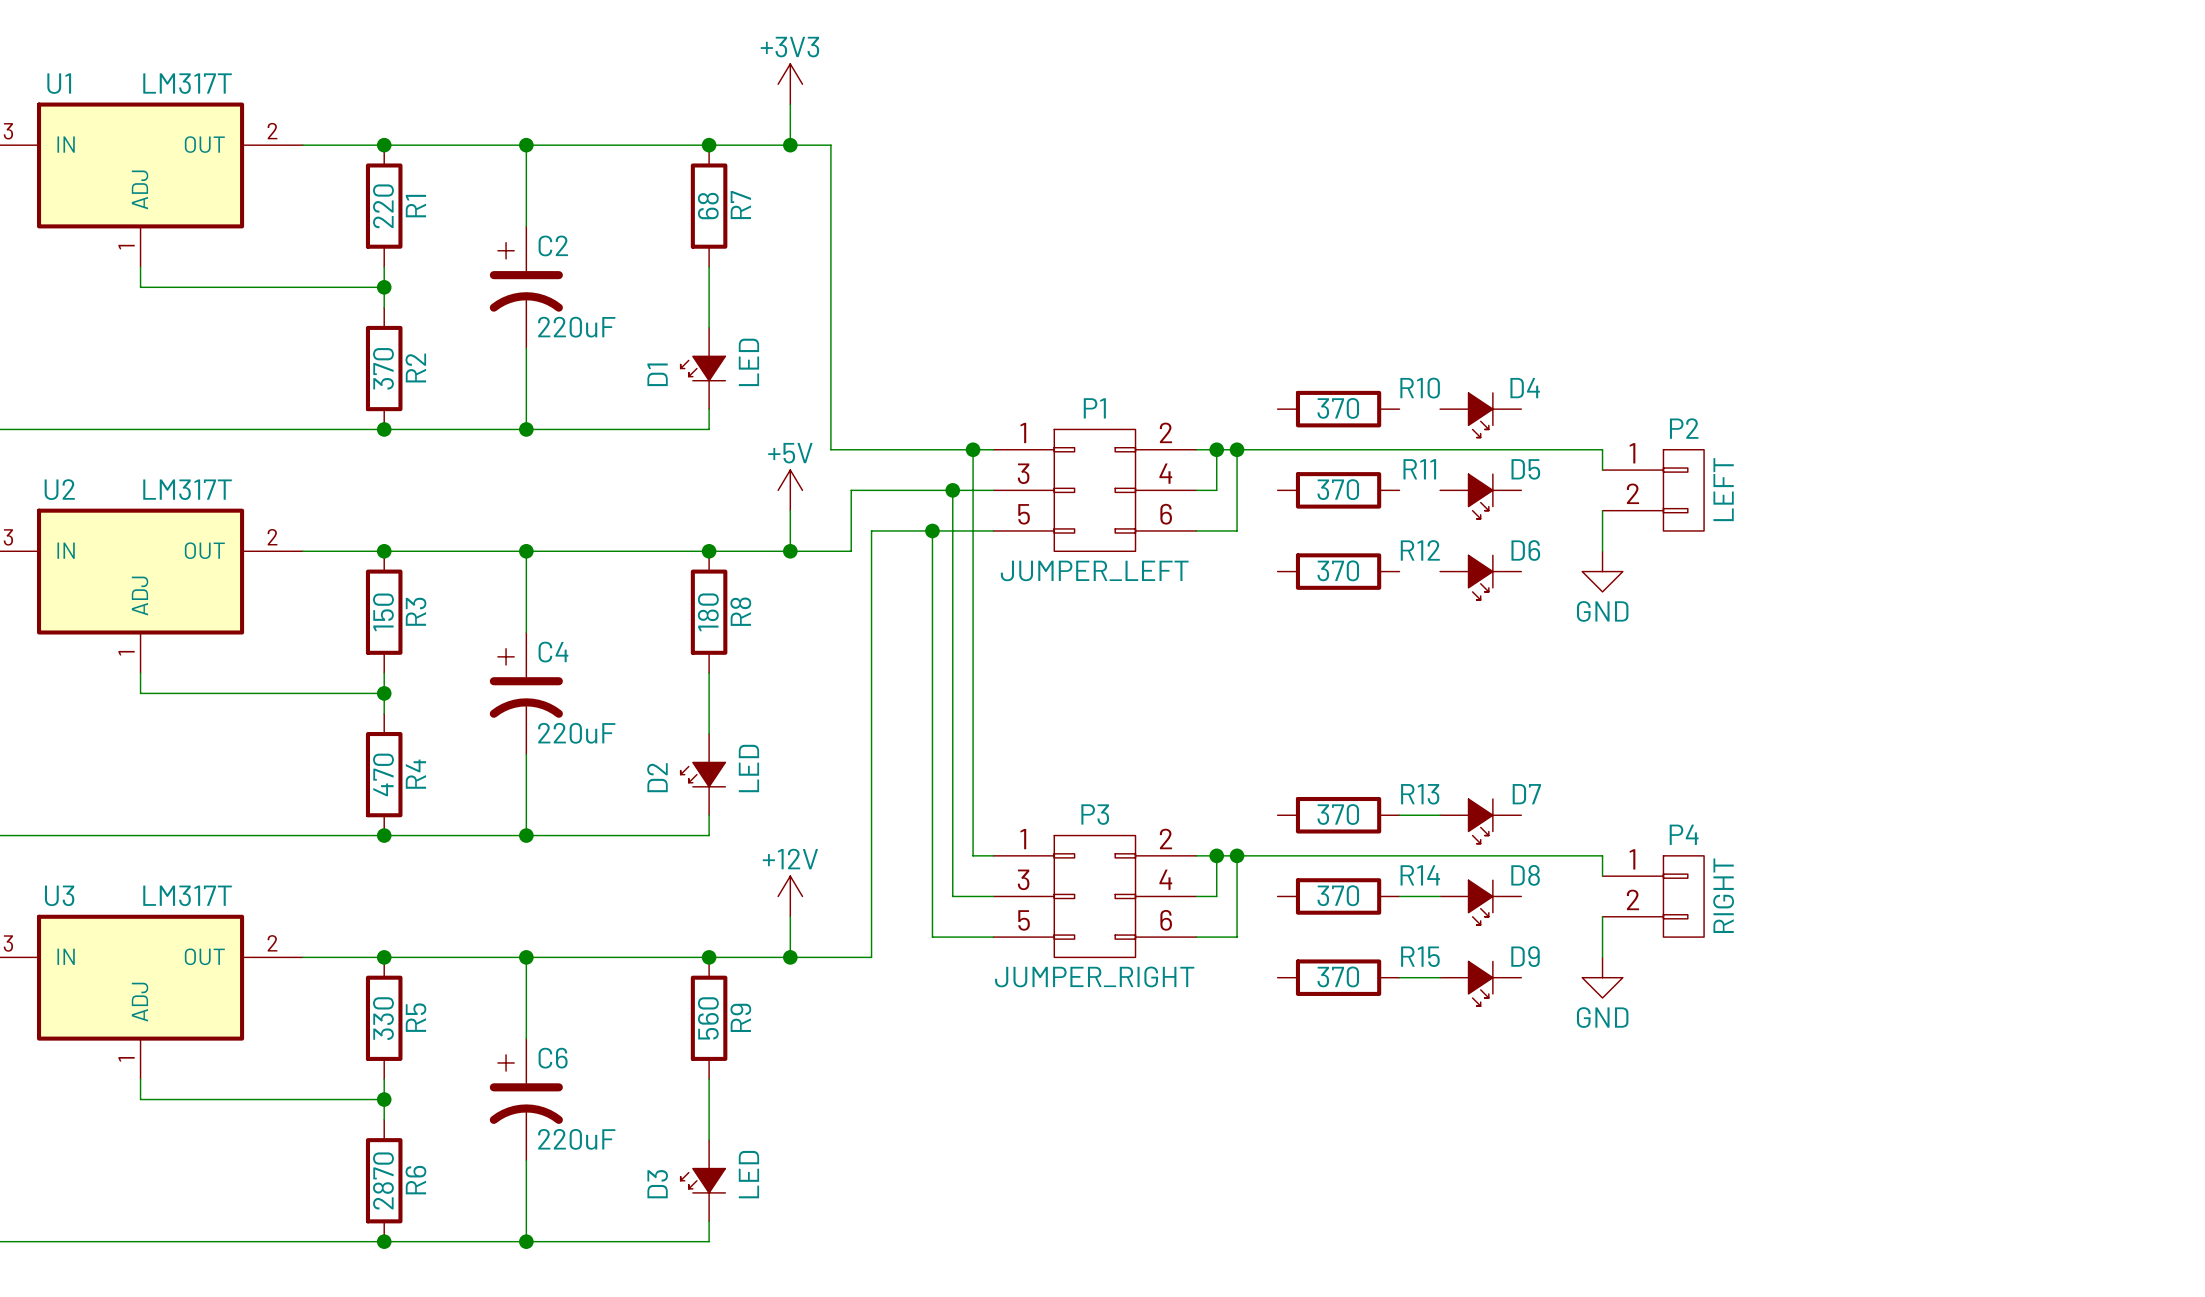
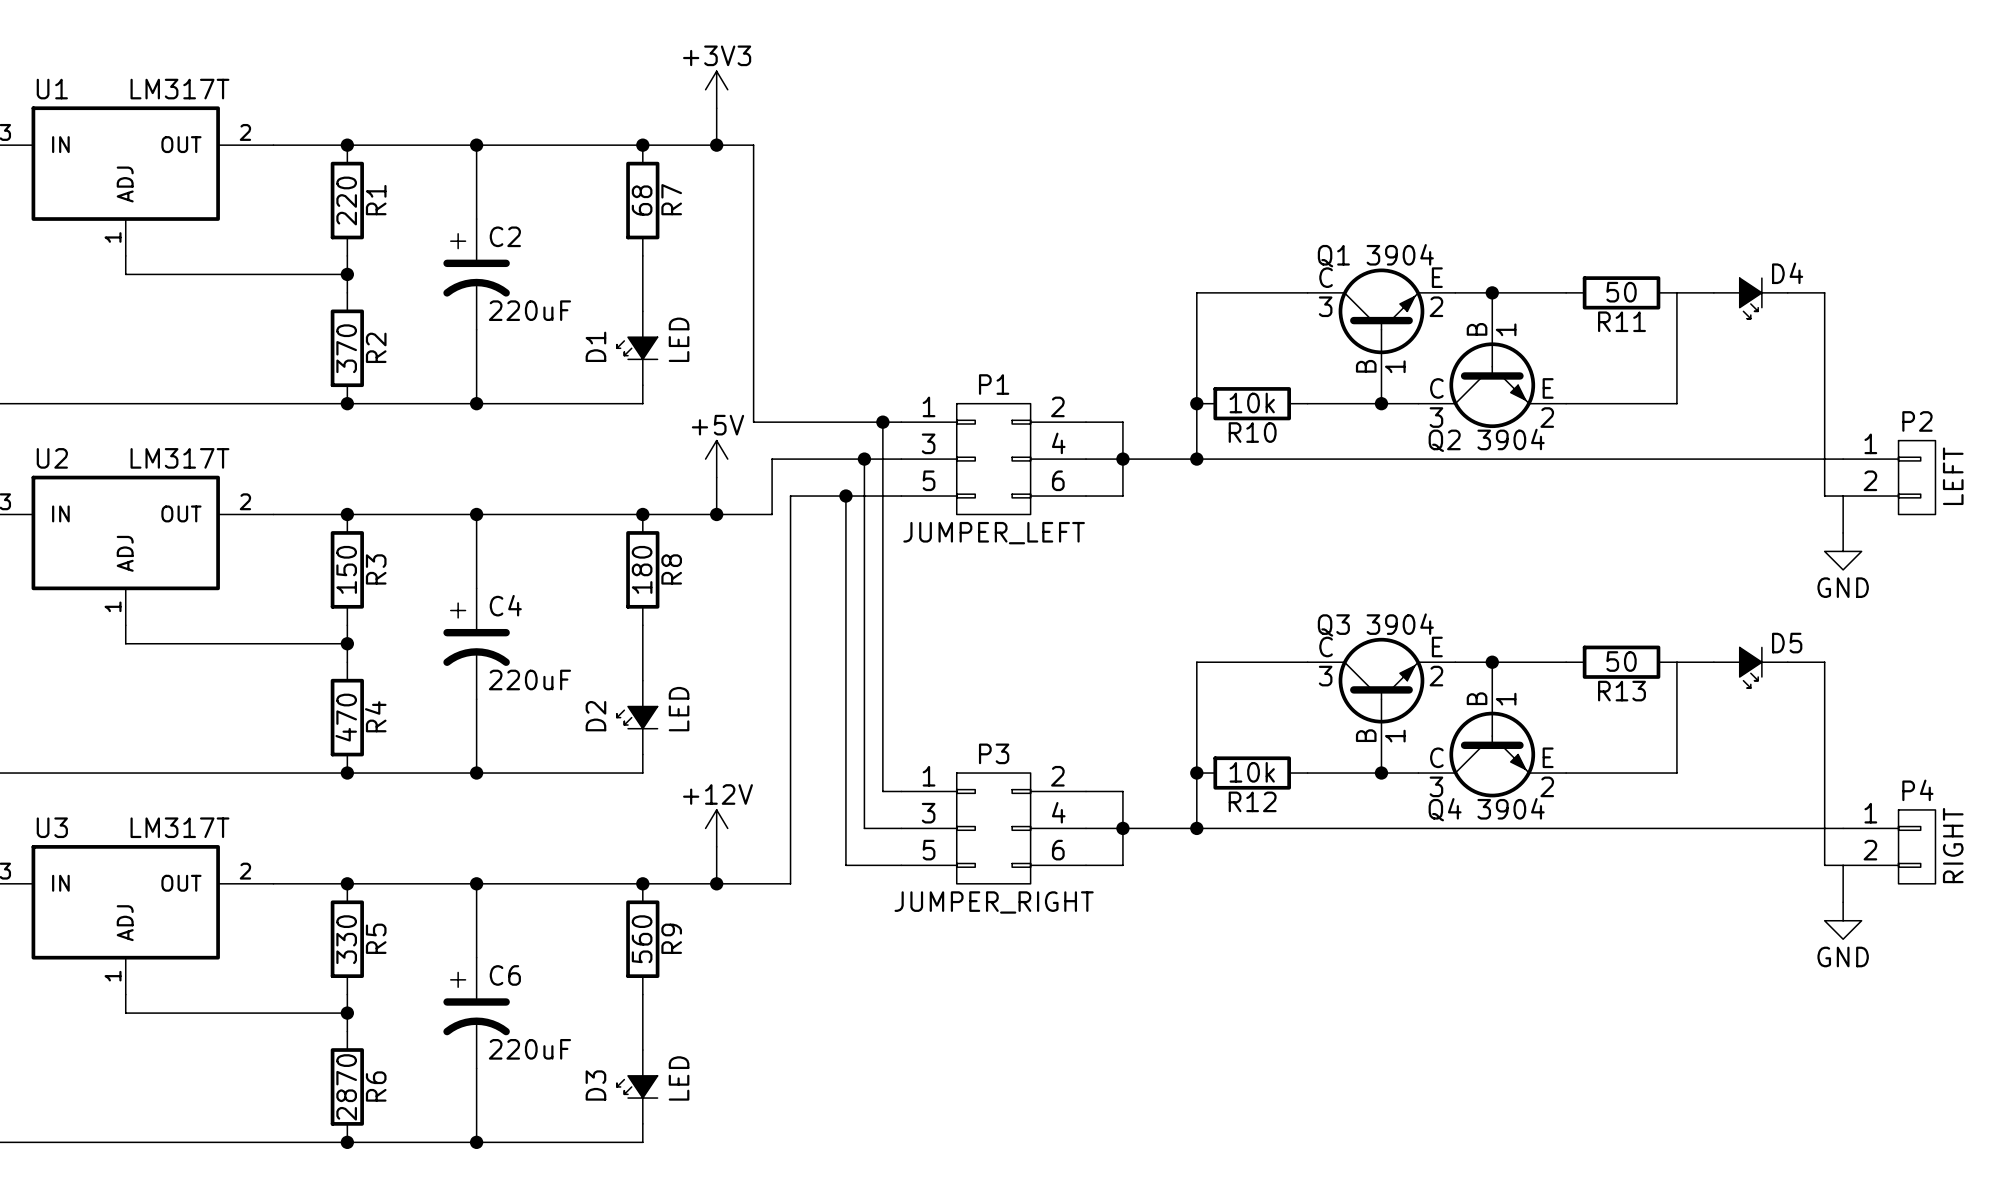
wire: none -> (1307, 292) (1196, 292) (1196, 459)
wire: none -> (1455, 292) (1566, 292)
junction: none -> (1492, 292)
wire: none -> (1713, 292) (1676, 292) (1676, 403) (1566, 403)
wire: none -> (1787, 292) (1824, 292) (1824, 496) (1843, 496) (1843, 532)
Q1: none -> 3904 (1381, 336)
Q2: none -> 3904 (1492, 360)
R10 name position: R10 (1420, 388) -> R10 (1252, 432)
R10 value: 370 (1338, 408) -> 10k (1252, 402)
R10 position: (1338, 409) -> (1252, 403)
D4 position: (1480, 415) -> (1750, 298)
junction: none -> (1196, 403)
wire: none -> (1307, 403) (1418, 403)
junction: none -> (1381, 403)
wire: (1216, 449) (1216, 490) -> (1843, 459) (1104, 459)
junction: (1216, 449) -> none
wire: (1237, 449) (1602, 449) (1602, 470) -> none
junction: (1237, 449) -> none
R11 name position: R11 (1419, 469) -> R11 (1621, 321)
R11 value: 370 (1338, 489) -> 50 (1621, 292)
junction: none -> (1122, 459)
junction: none -> (1196, 459)
R11 position: (1338, 490) -> (1621, 292)
P2 position: (1653, 490) -> (1889, 477)
D5 position: (1480, 496) -> (1750, 667)
wire: (1602, 510) (1602, 551) -> none
R12 name position: R12 (1420, 550) -> R12 (1252, 801)
R12 value: 370 (1338, 570) -> 10k (1252, 772)
R12 position: (1338, 571) -> (1252, 773)
power symbol: GND (1602, 571) -> none
D6: (1480, 577) -> none
power symbol: none -> GND (1843, 551)
wire: none -> (1307, 662) (1196, 662) (1196, 828)
wire: none -> (1455, 662) (1566, 662)
junction: none -> (1492, 662)
wire: none -> (1713, 662) (1676, 662) (1676, 773) (1566, 773)
wire: none -> (1787, 662) (1824, 662) (1824, 865) (1843, 865) (1843, 902)
Q3: none -> 3904 (1381, 705)
Q4: none -> 3904 (1492, 729)
R13 name position: R13 (1420, 794) -> R13 (1621, 691)
R13 value: 370 (1338, 814) -> 50 (1621, 661)
R13 position: (1338, 815) -> (1621, 662)
wire: (1399, 815) (1440, 815) -> none
D7: (1480, 821) -> none
junction: none -> (1196, 773)
wire: none -> (1307, 773) (1418, 773)
junction: none -> (1381, 773)
wire: (1216, 855) (1216, 896) -> (1270, 828) (1104, 828)
junction: (1216, 855) -> none
wire: (1237, 855) (1602, 855) (1602, 876) -> none
junction: (1237, 855) -> none
junction: none -> (1122, 828)
junction: none -> (1196, 828)
R14: 370 (1338, 896) -> none
wire: none -> (1307, 828) (1843, 828)
P4 position: (1653, 896) -> (1889, 846)
D8: (1480, 902) -> none
wire: (1602, 916) (1602, 957) -> none
R15: 370 (1338, 977) -> none
wire: (1399, 977) (1440, 977) -> none
power symbol: GND (1602, 977) -> none
D9: (1480, 983) -> none
power symbol: none -> GND (1843, 920)

